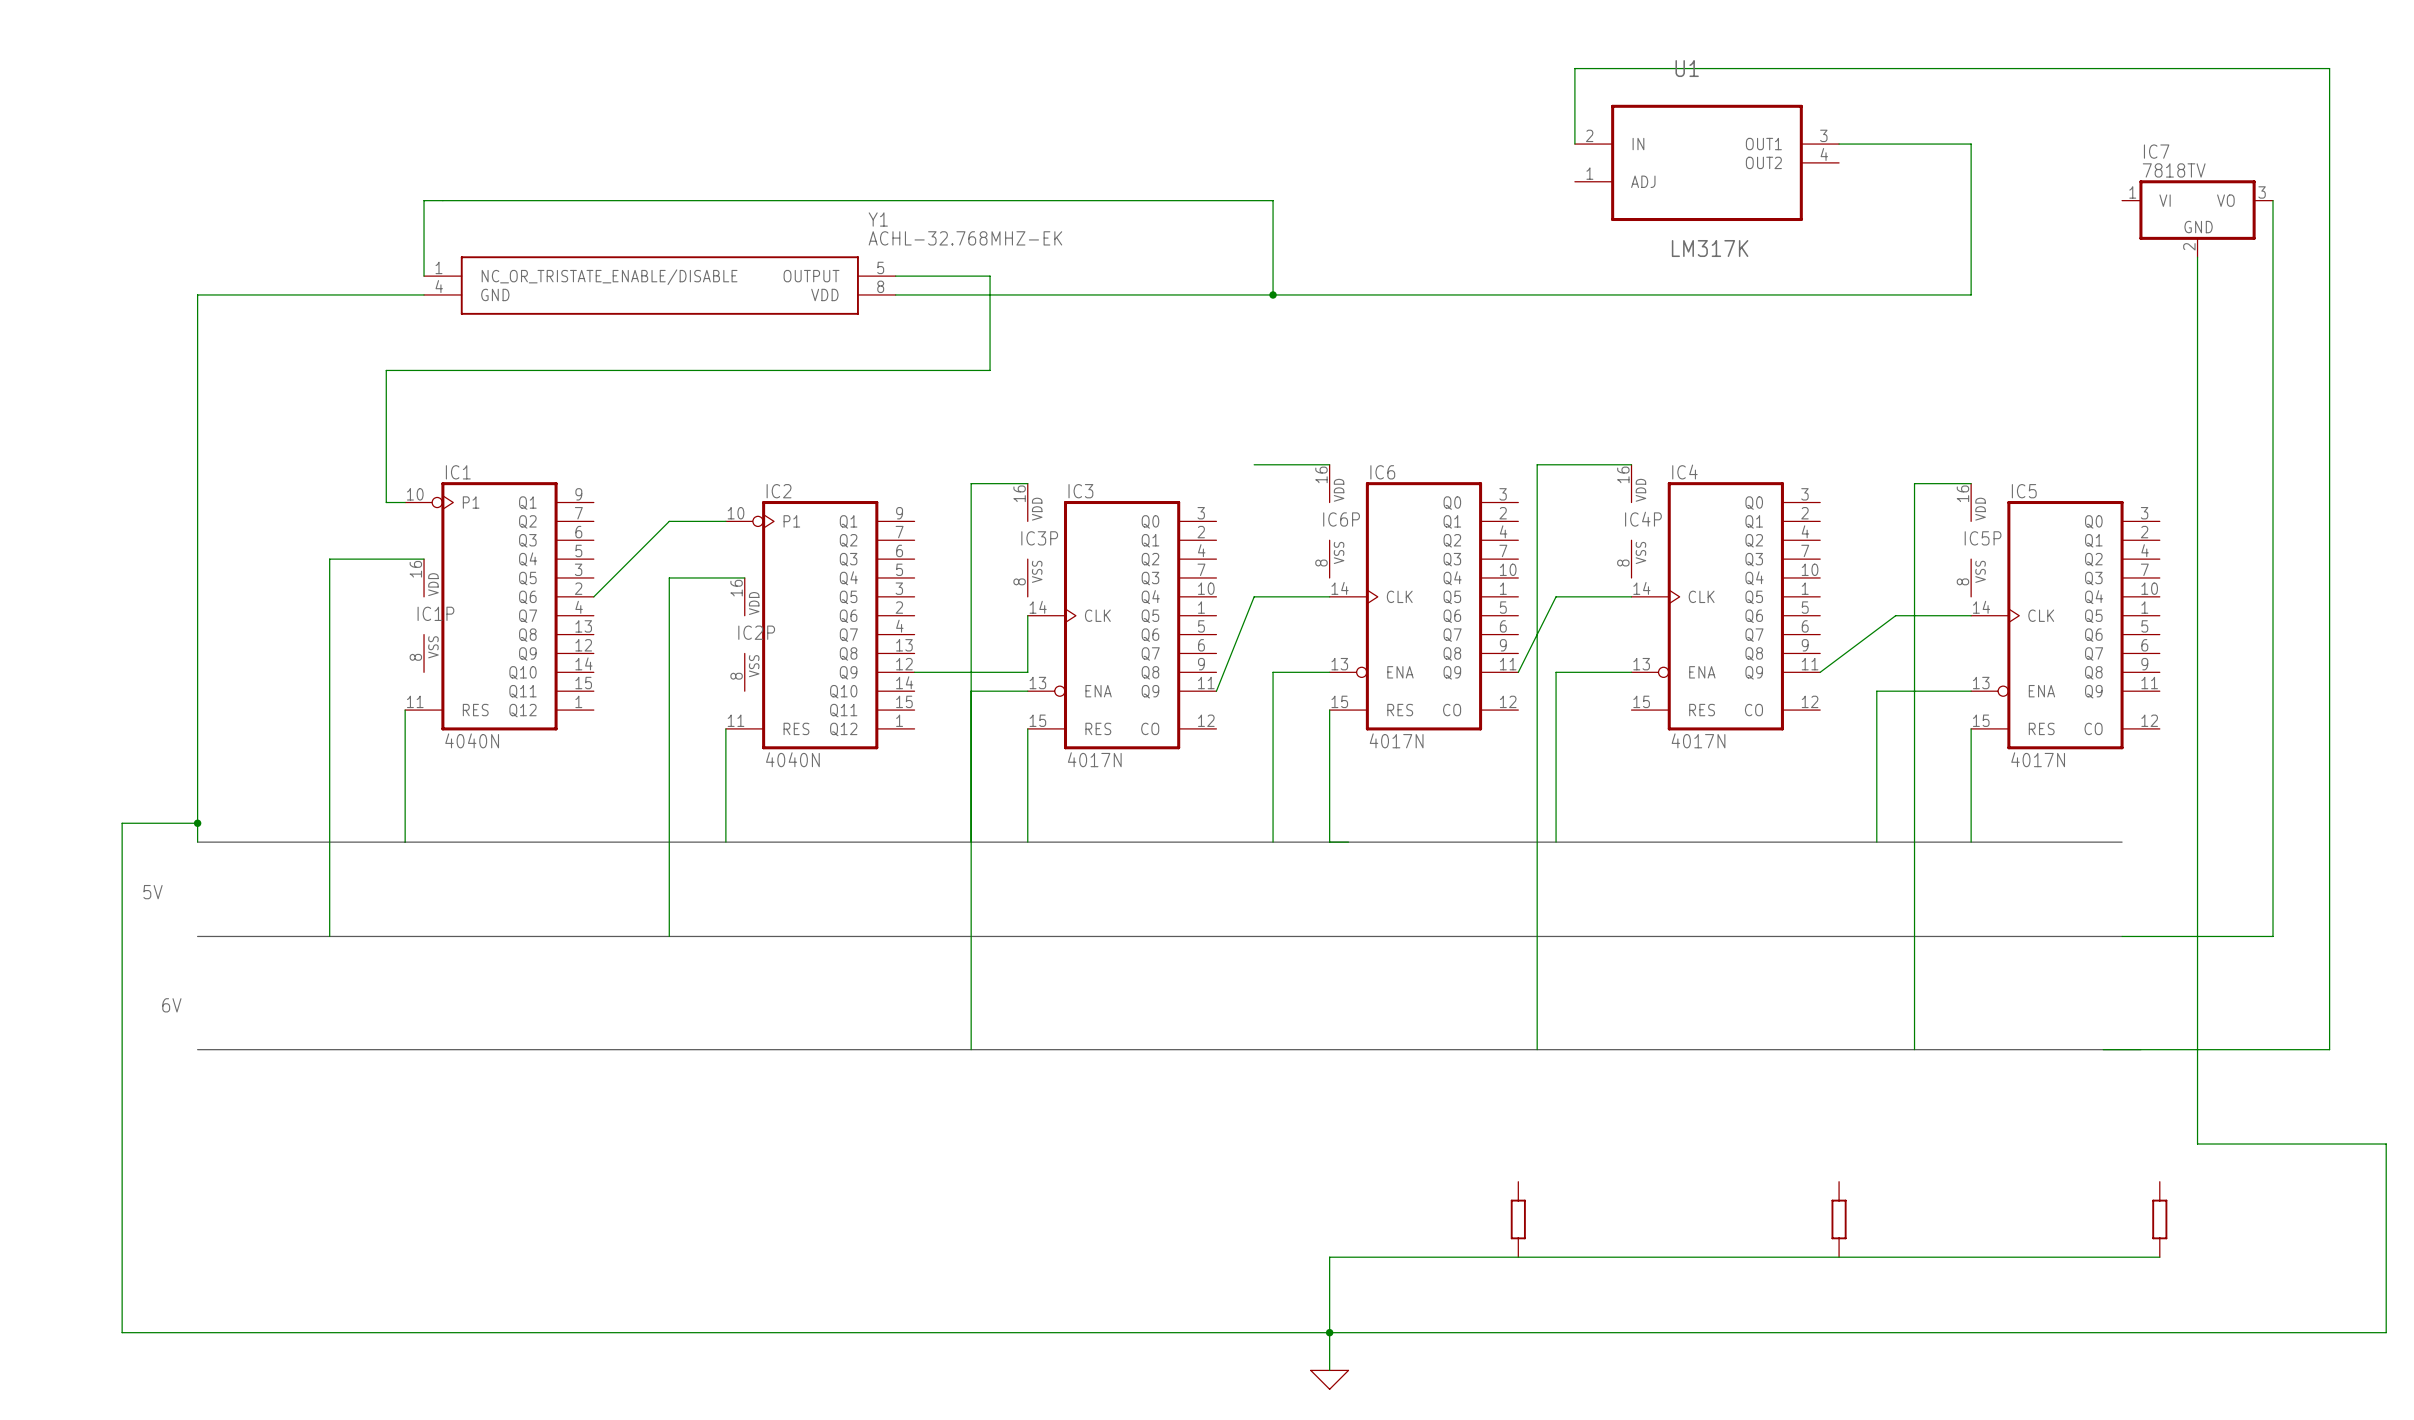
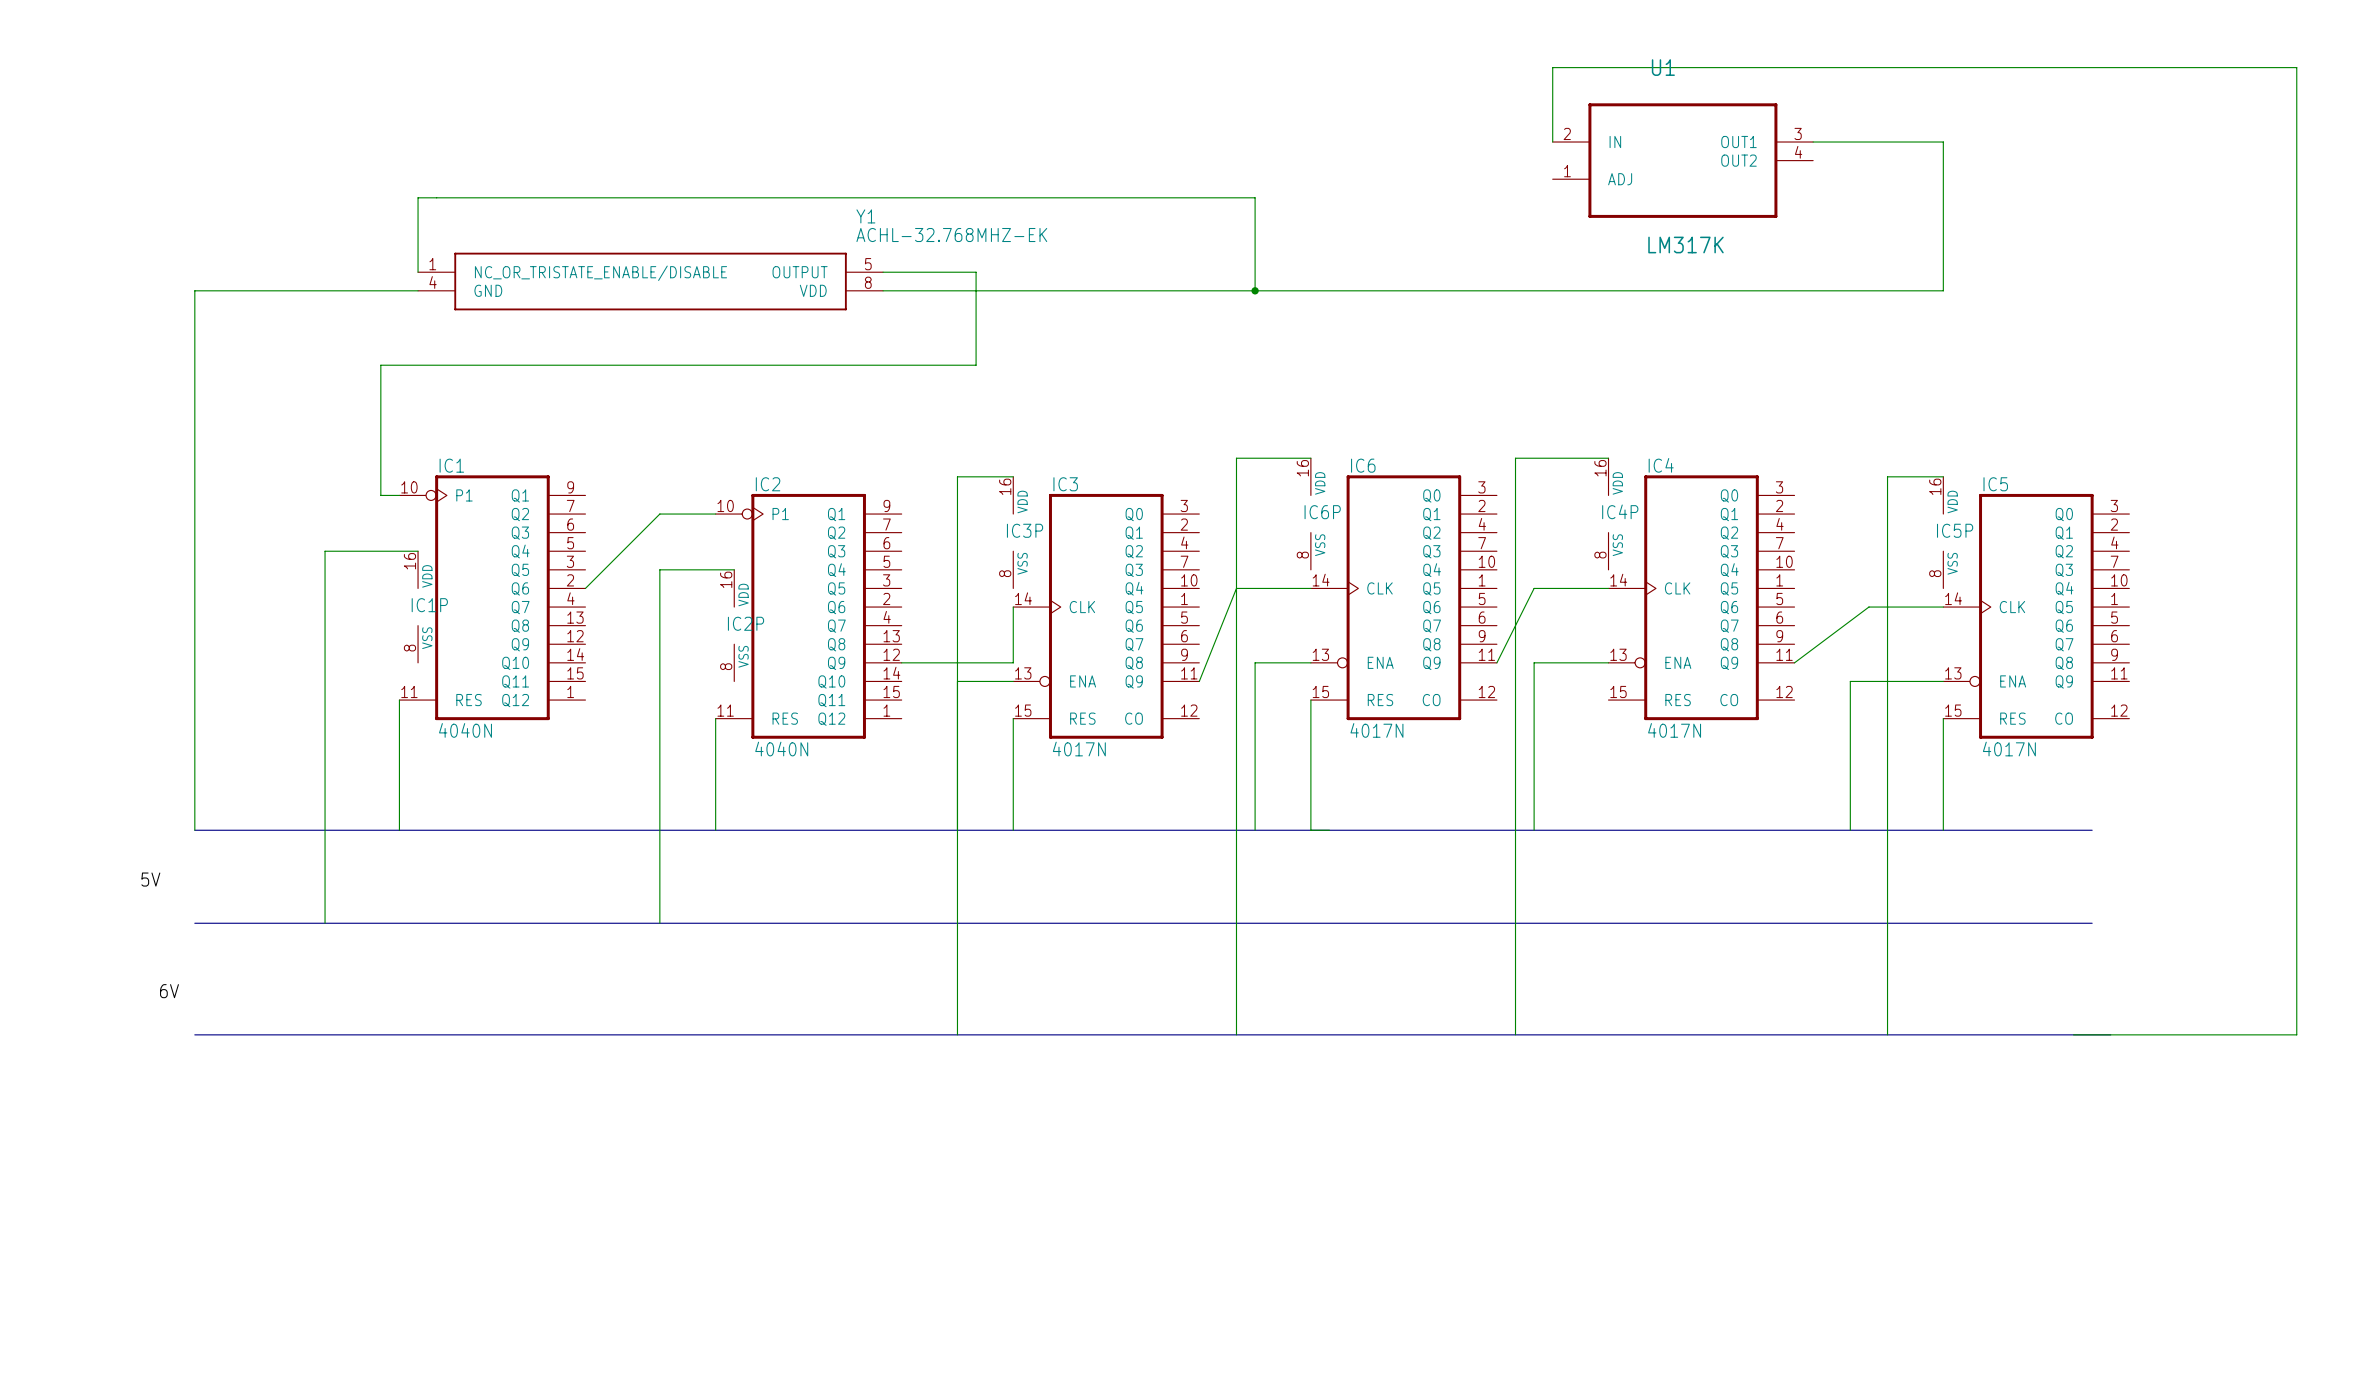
wire: (2273, 200) (2273, 936) (2122, 936) -> none
IC7: 7818TV (2197, 218) -> none
wire: (2197, 257) (2197, 1144) (2386, 1144) (2386, 1332) (122, 1332) (122, 823) (197, 823) -> none
wire: none -> (1236, 458) (1236, 1034)
junction: (197, 823) -> none
part: (1518, 1219) -> none
part: (1839, 1219) -> none
part: (2159, 1219) -> none
wire: (2159, 1257) (1329, 1257) (1329, 1370) -> none
junction: (1329, 1332) -> none
power symbol: (1329, 1379) -> none

